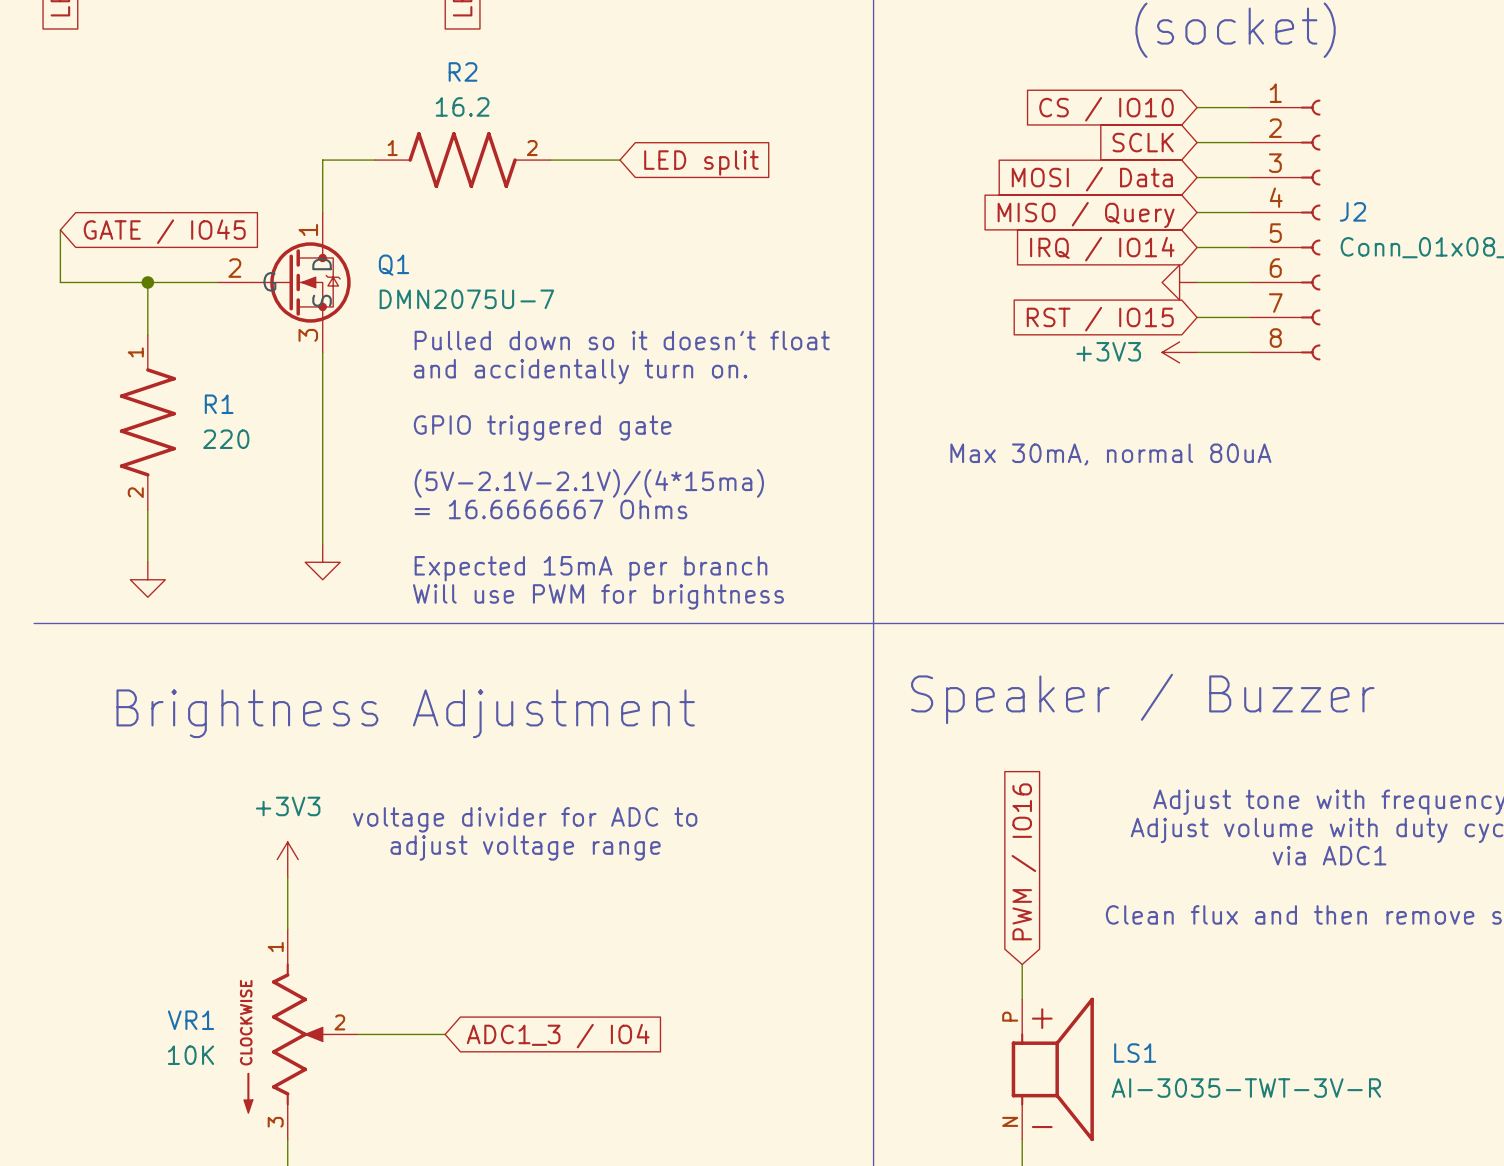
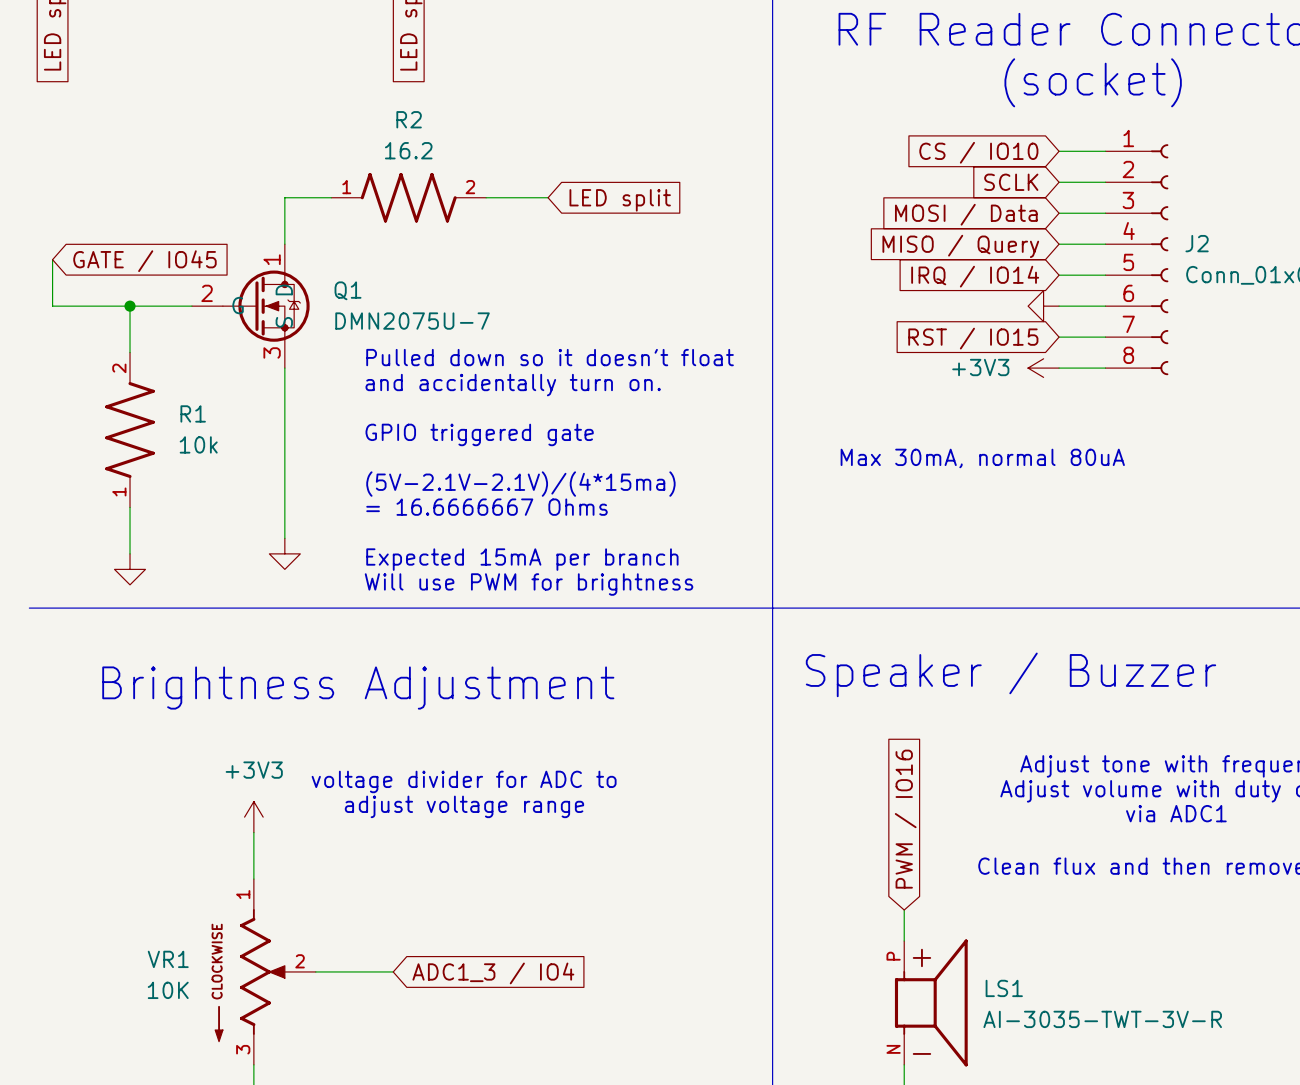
R1 rotation: 0° (147, 422) -> 180° (130, 430)
R1 value: 220 (226, 439) -> 10k (198, 444)

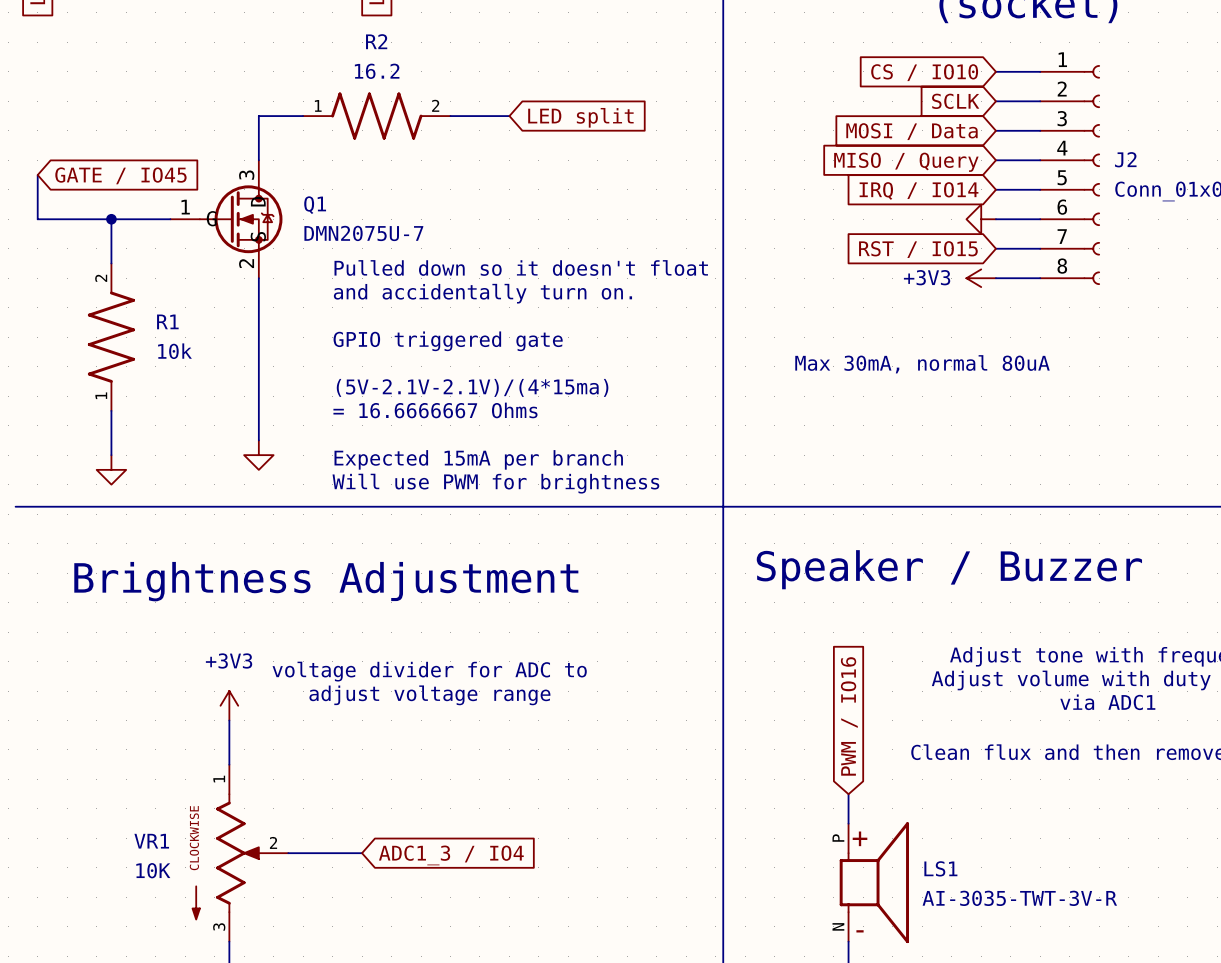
Q1 pin number: 1 (272, 259) -> 3 (246, 175)
Q1 pin number: 2 (207, 293) -> 1 (185, 207)
Q1 pin number: 3 (272, 352) -> 2 (246, 263)

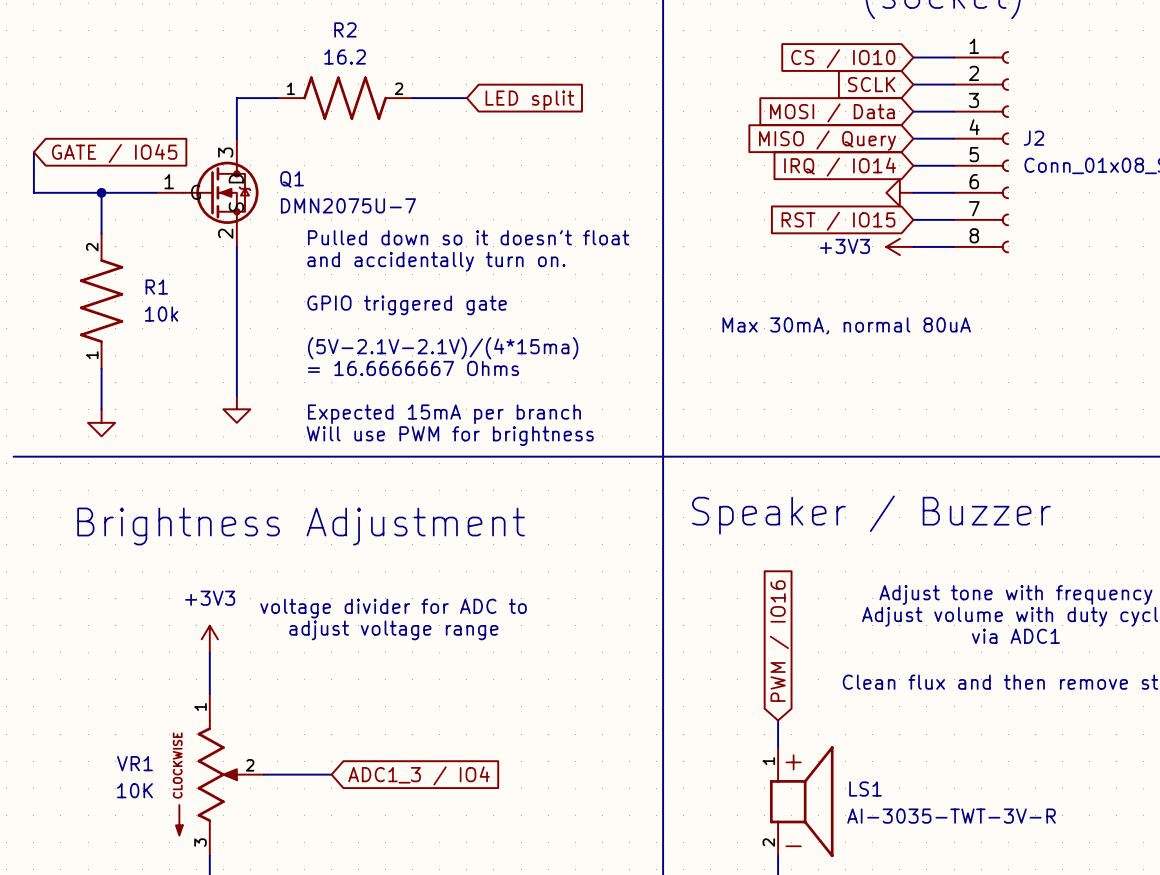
LS1 pin number: P (838, 838) -> 1 (768, 761)
LS1 pin number: N (838, 926) -> 2 (768, 842)

